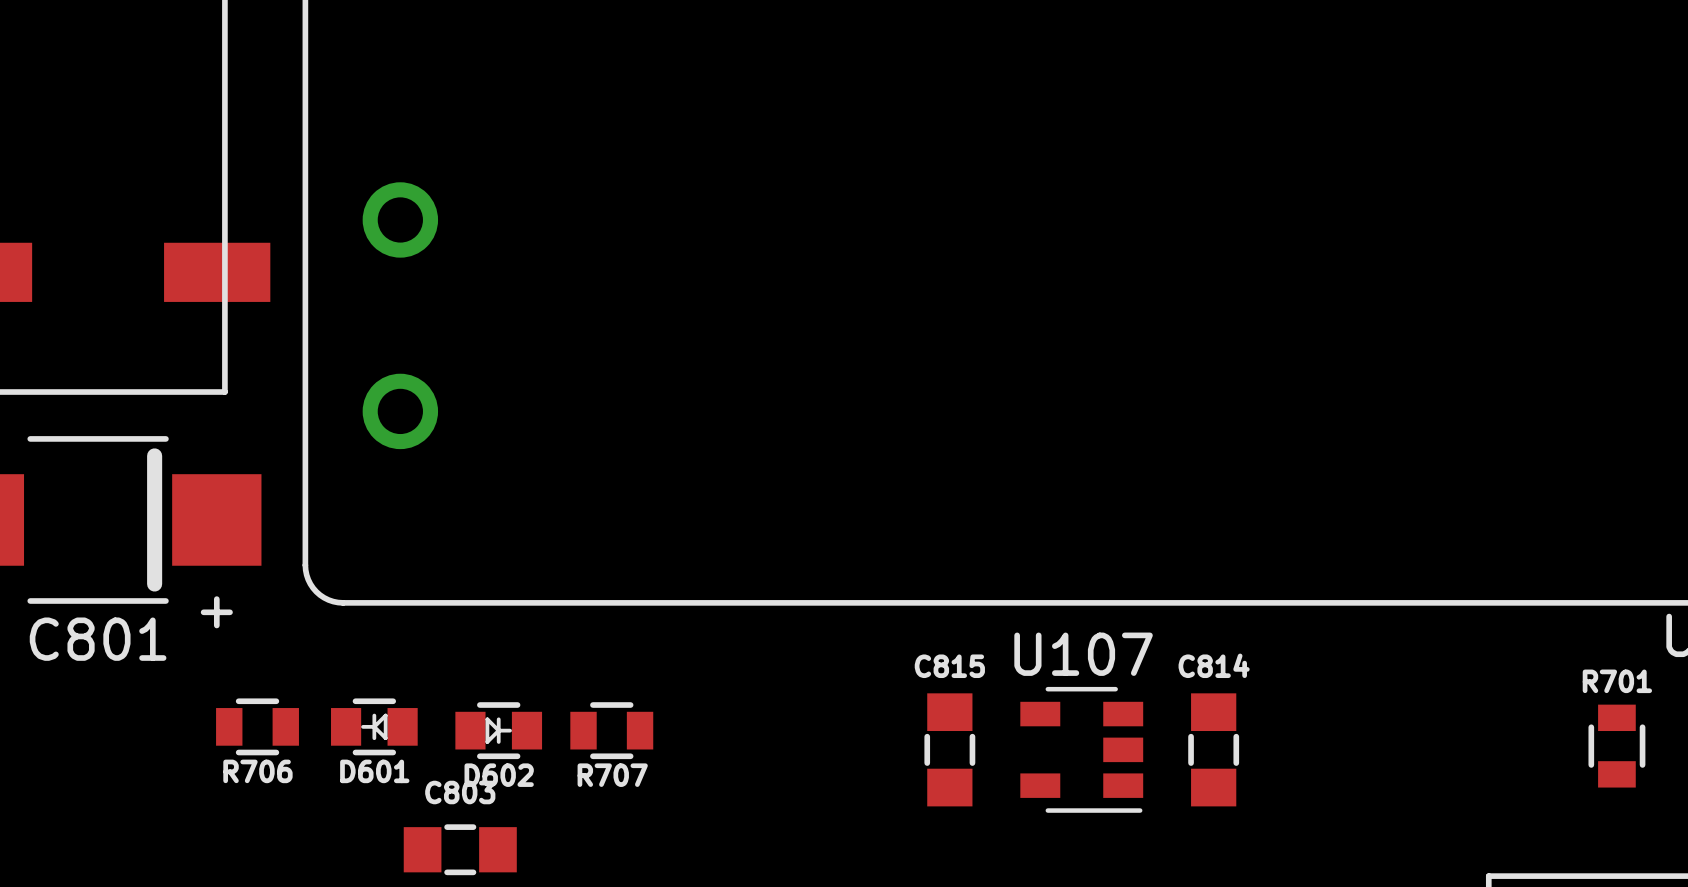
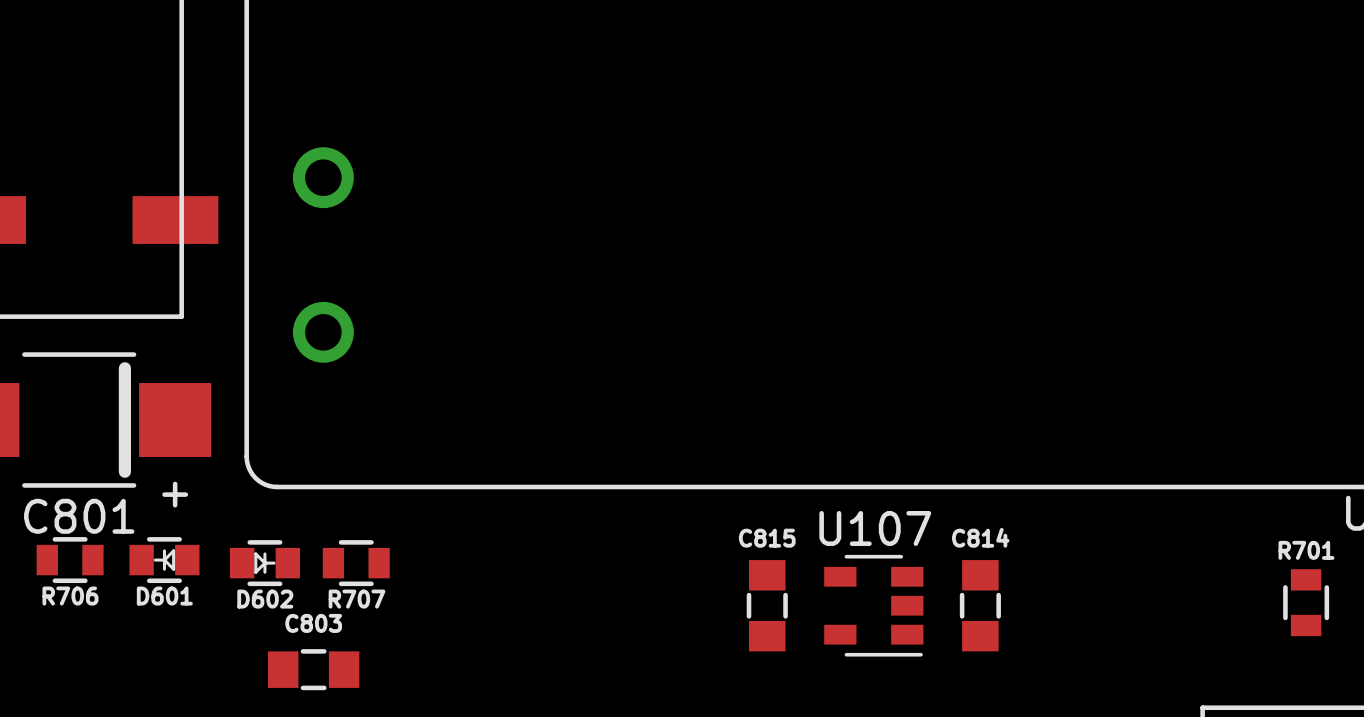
R706 position: (257, 726) -> (70, 560)
D601 position: (374, 726) -> (164, 560)
D602 position: (498, 730) -> (264, 563)
R707 position: (611, 730) -> (356, 563)
C803 position: (460, 849) -> (313, 669)

